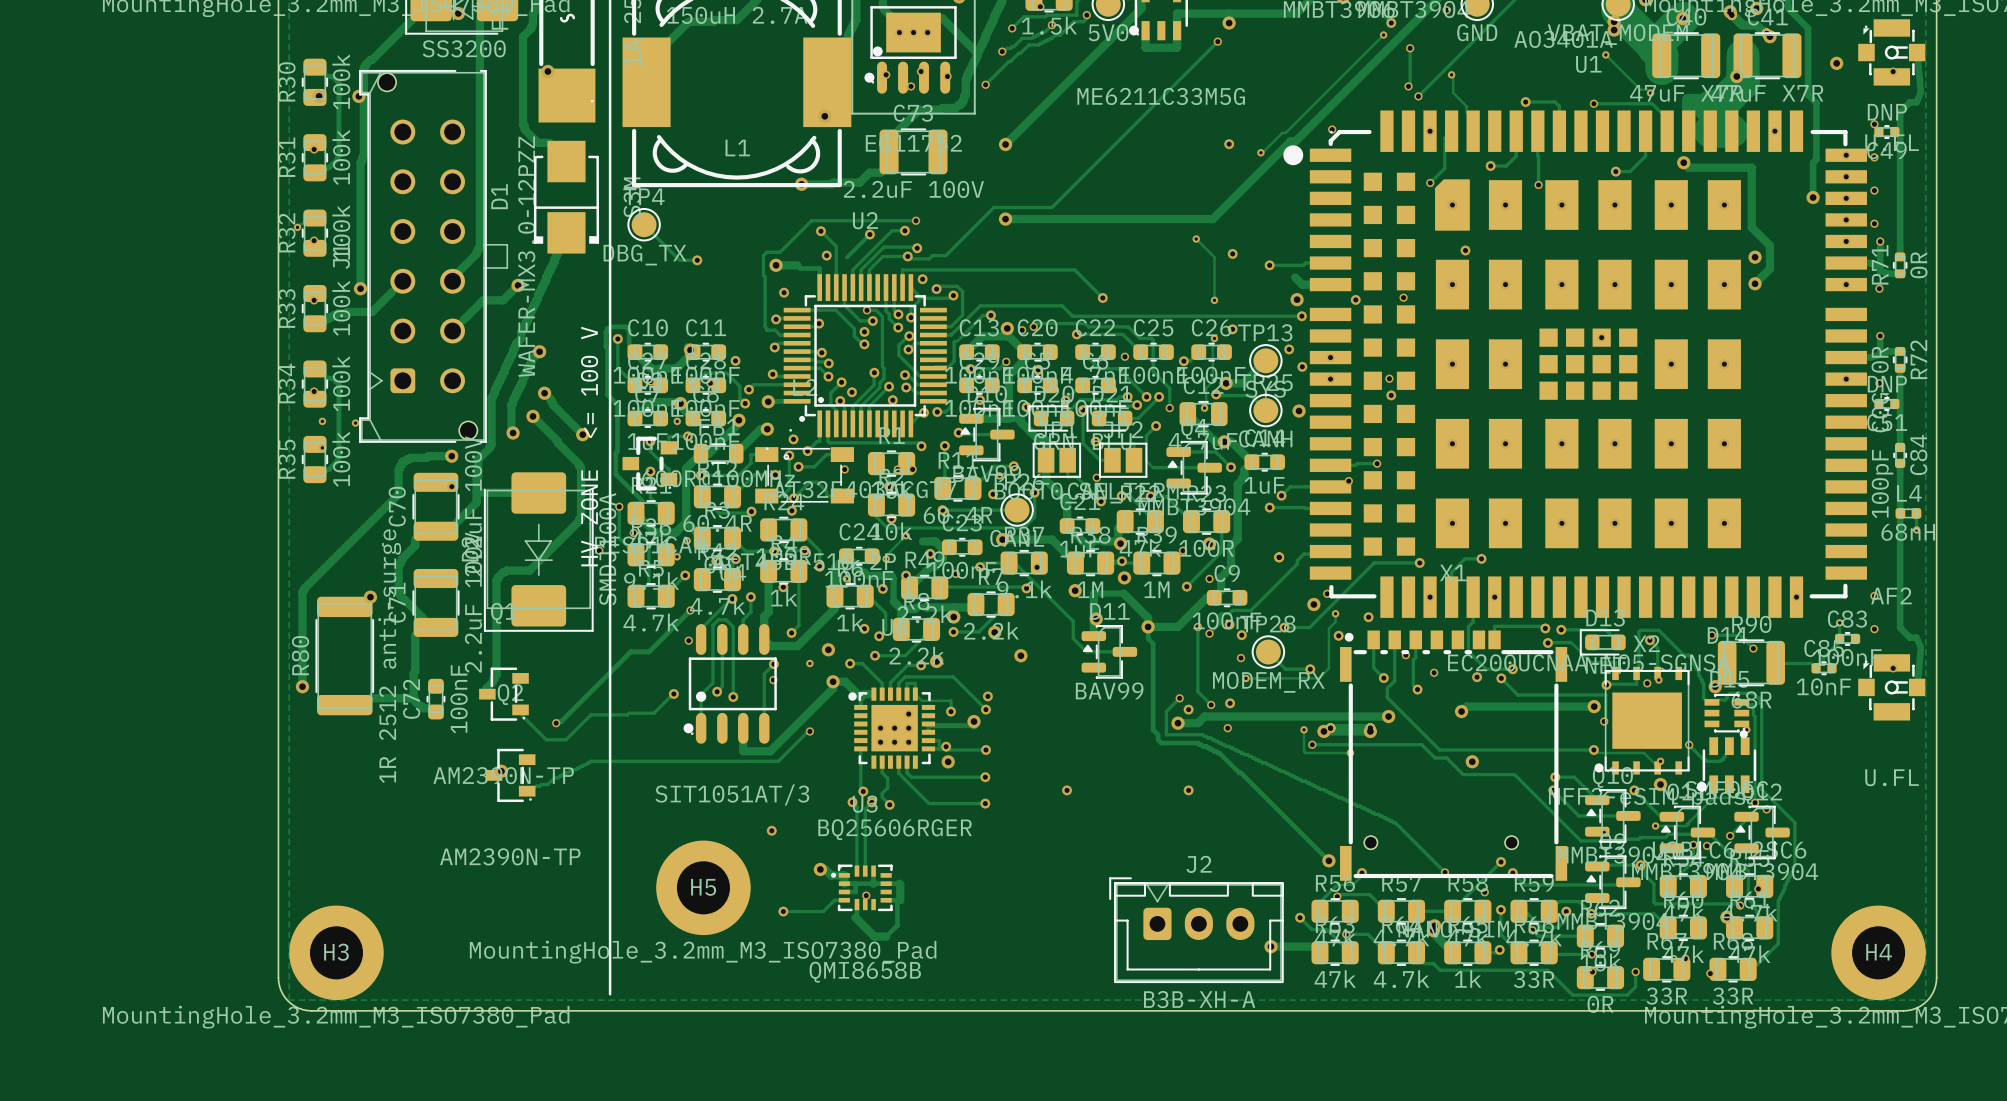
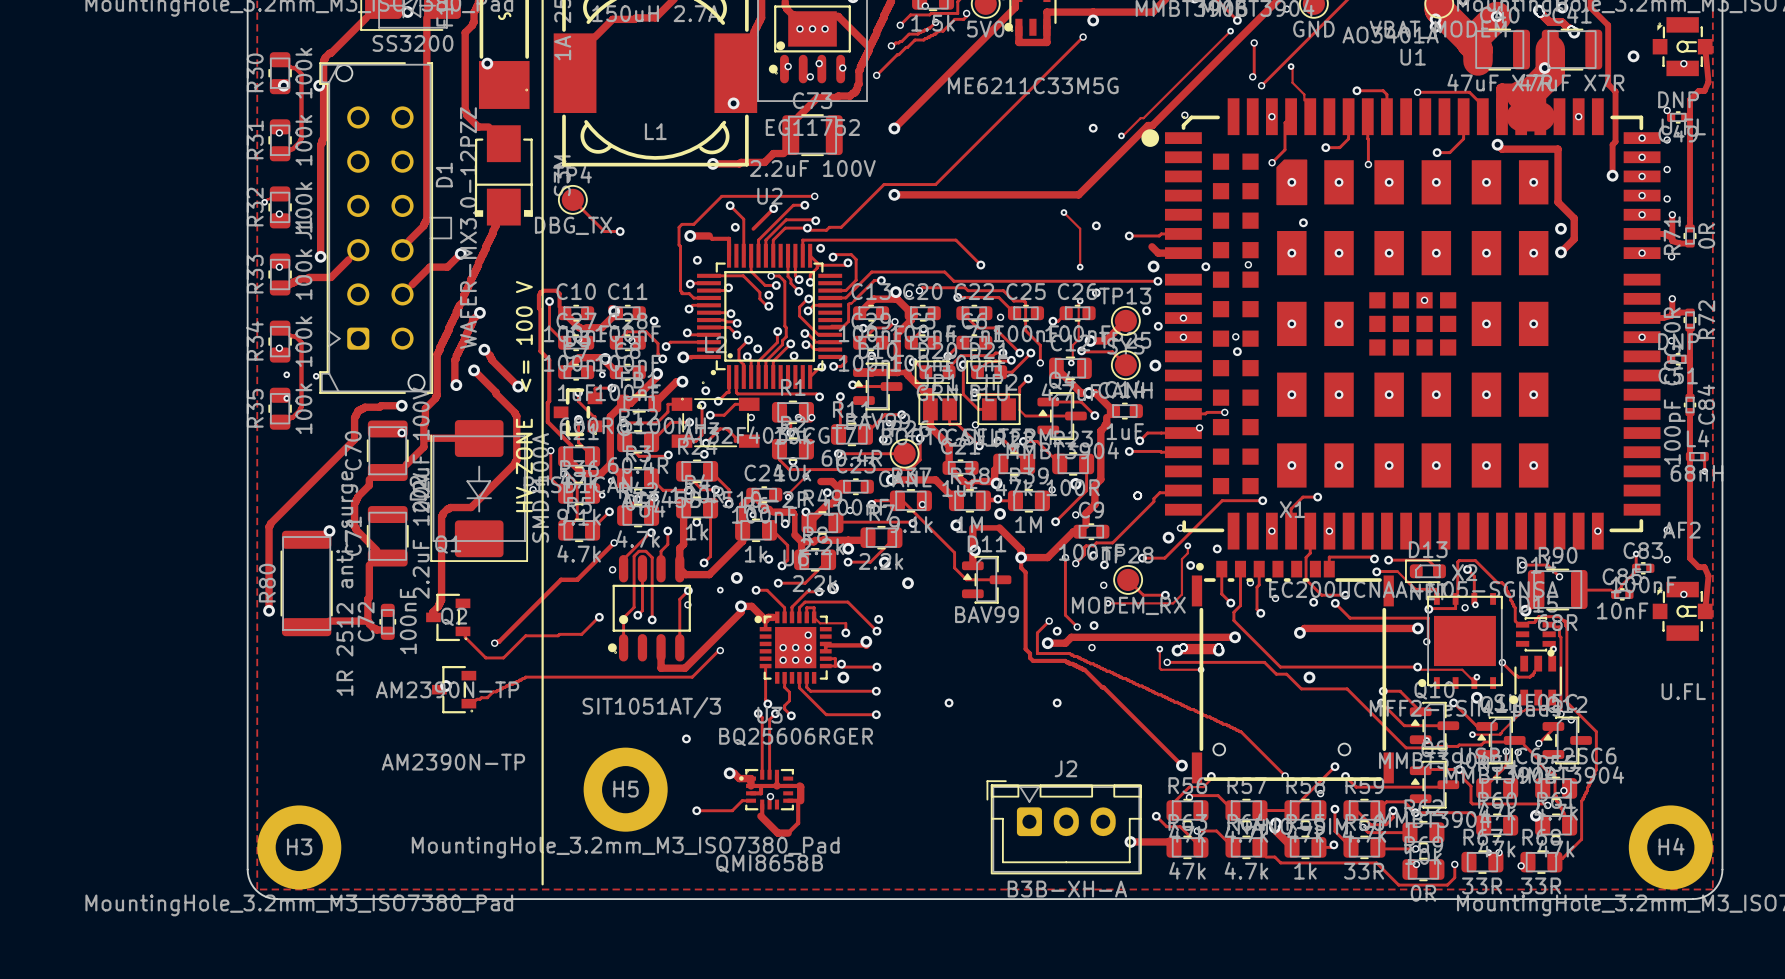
track: (1605, 54) (1640, 89) (1647, 89) (1650, 93) -> none
via: (1605, 54) -> none
via: (1650, 93) -> none

